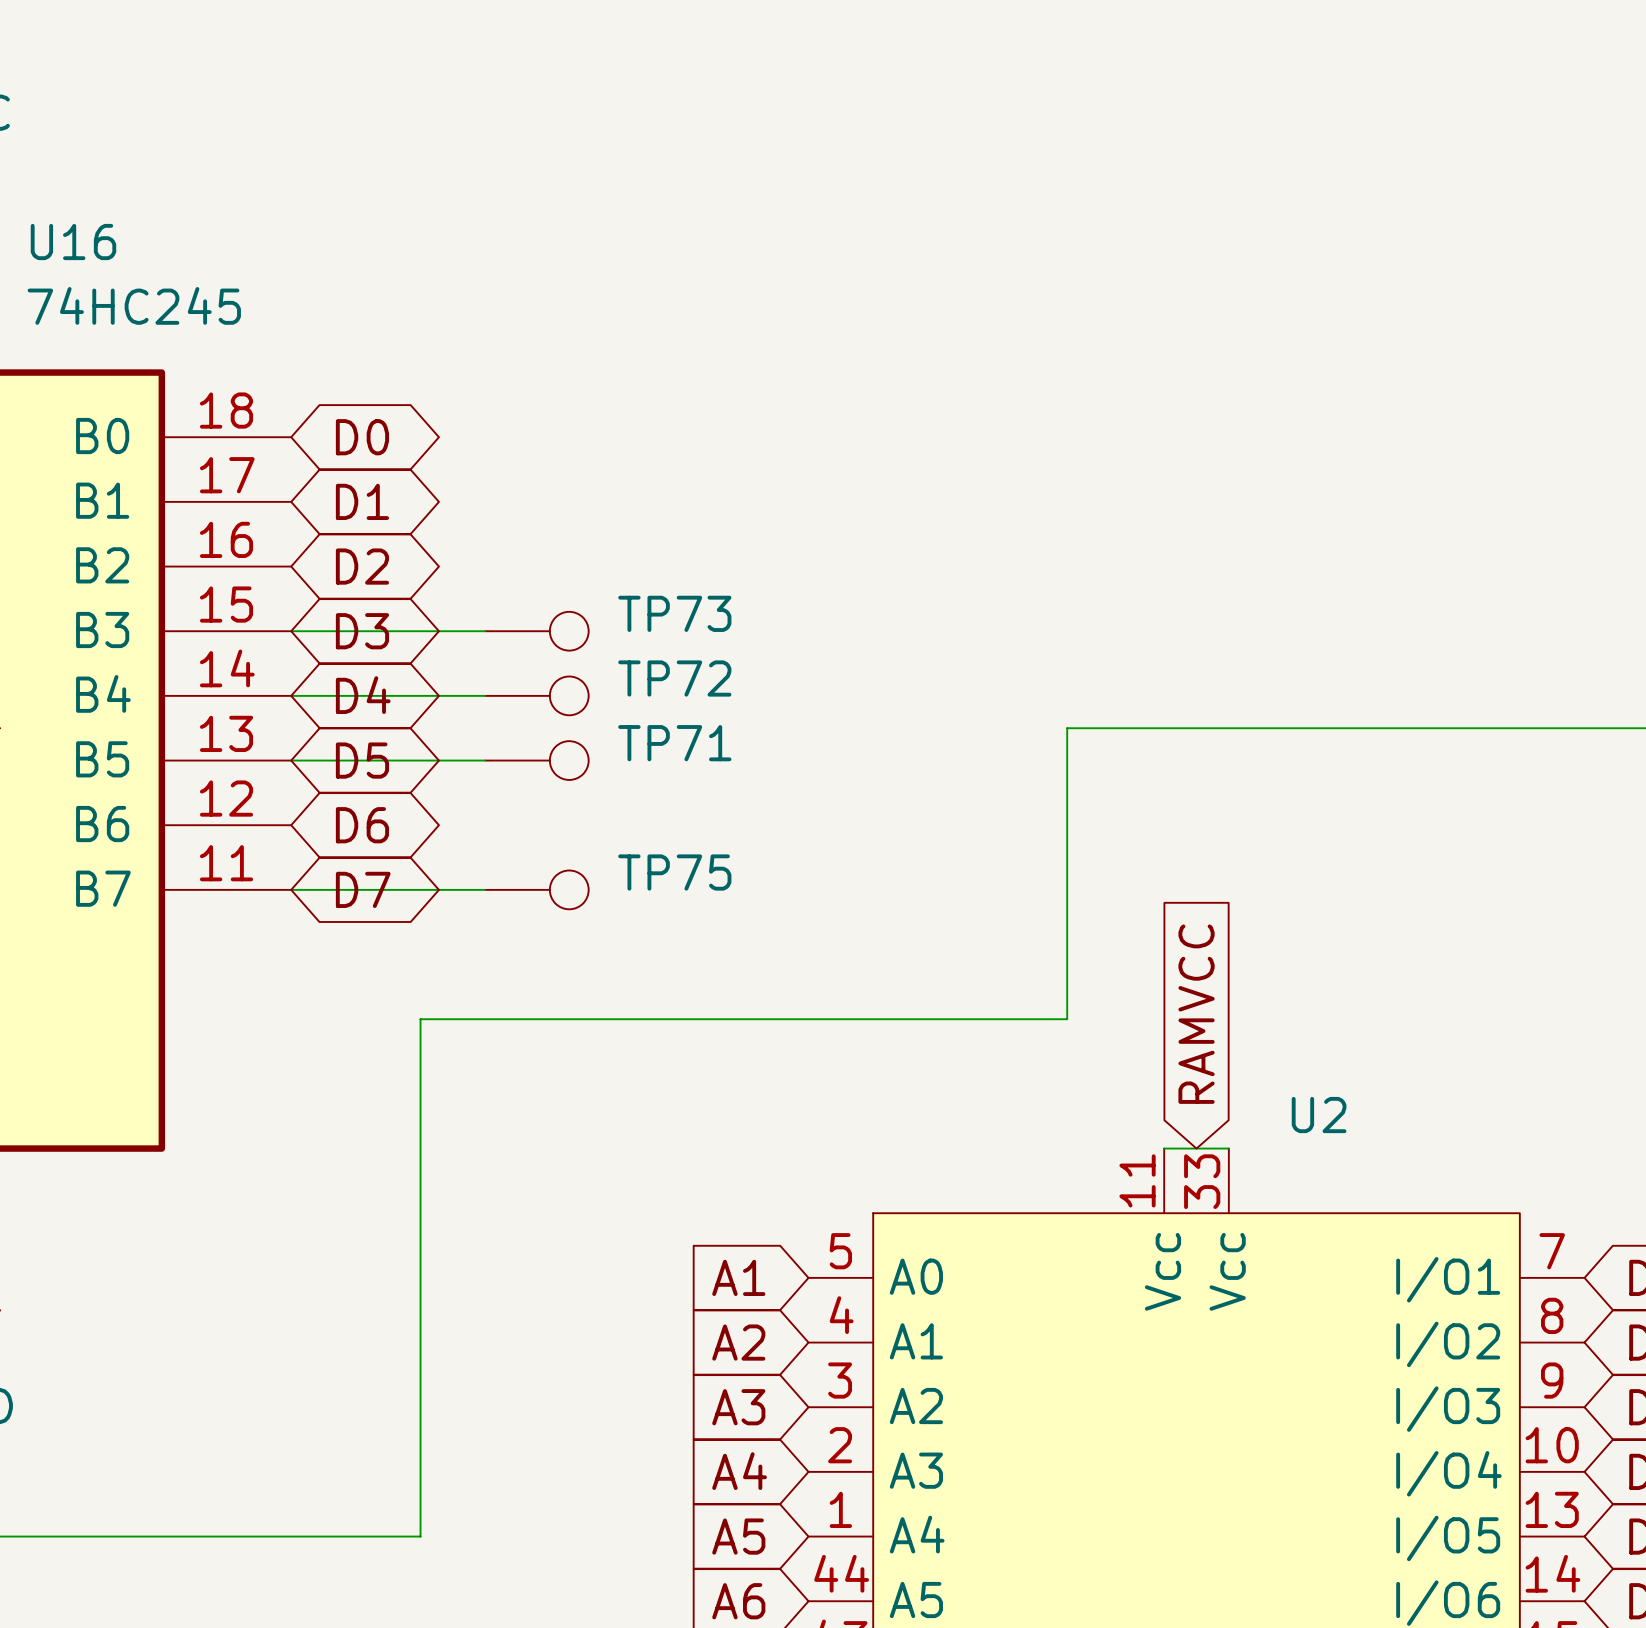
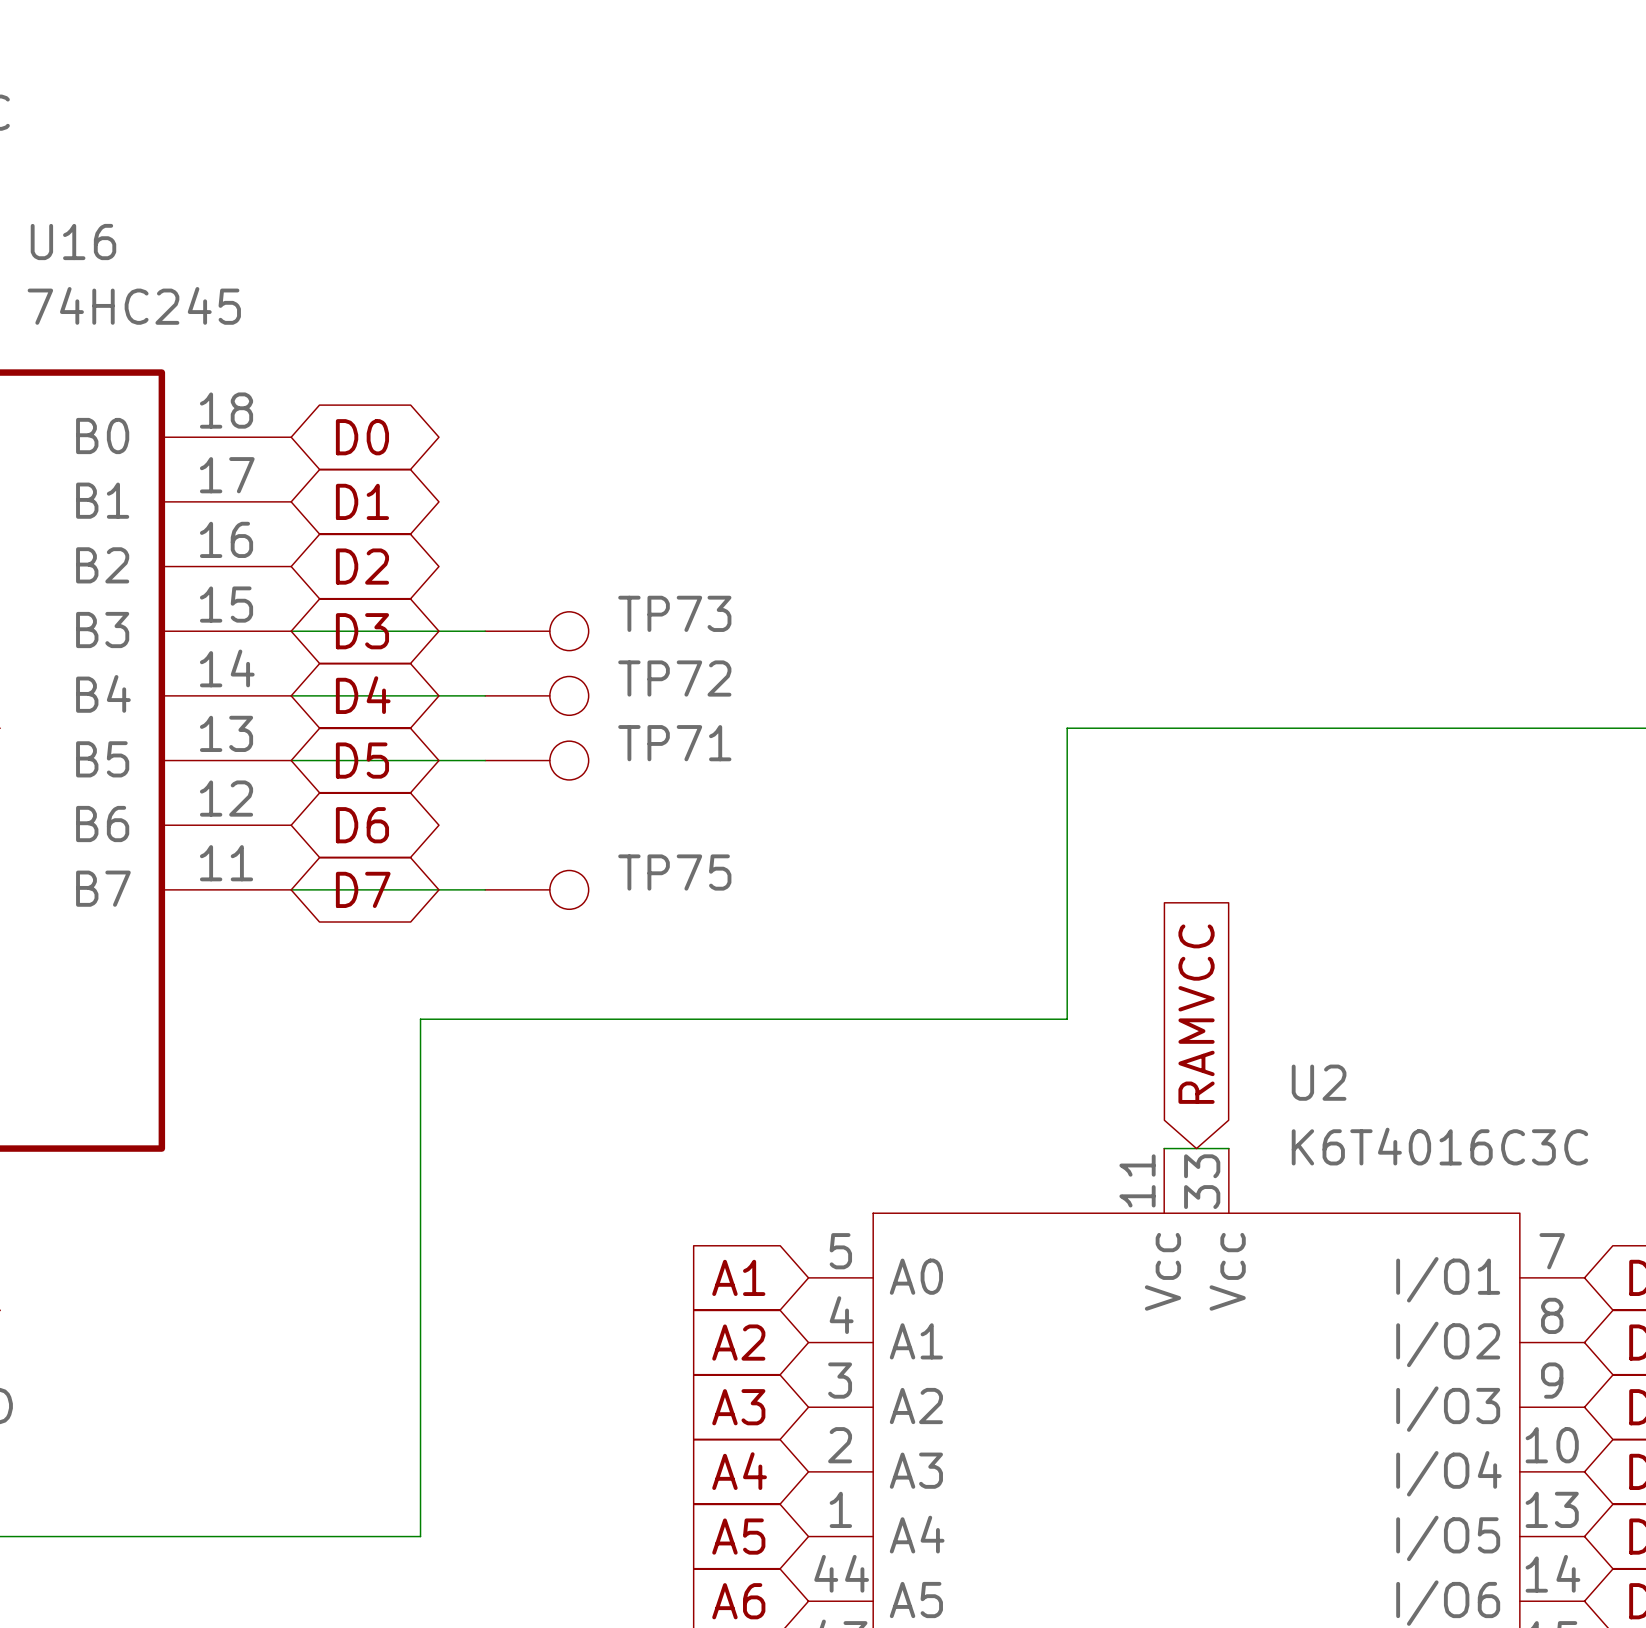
U2 name position: U2 (1319, 1115) -> U2 (1319, 1082)
U2 value: none -> K6T4016C3C (1439, 1146)

